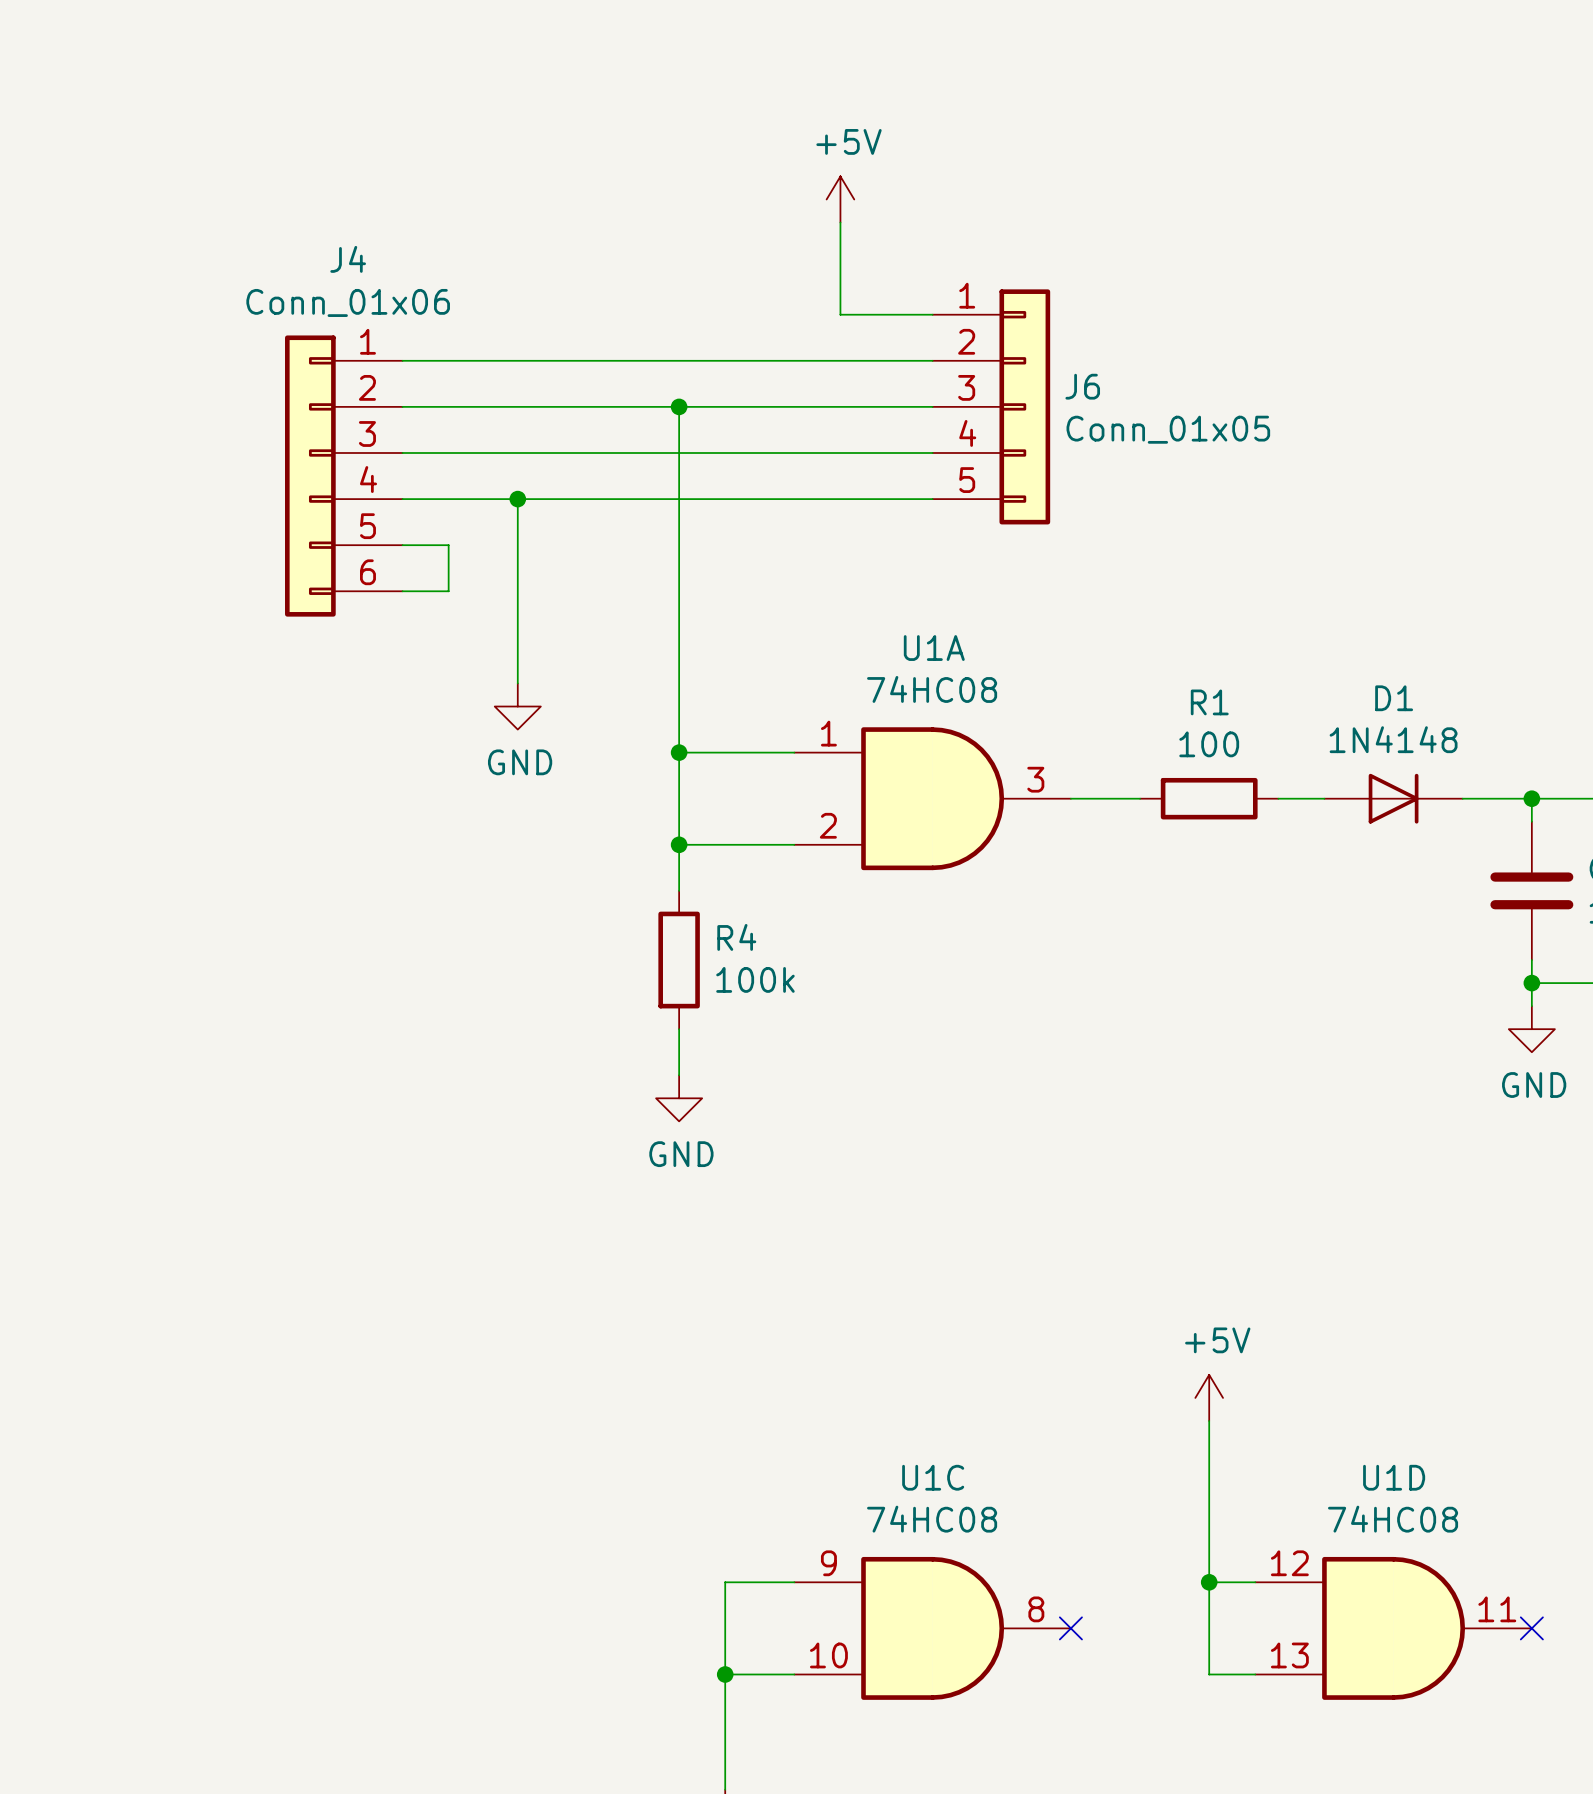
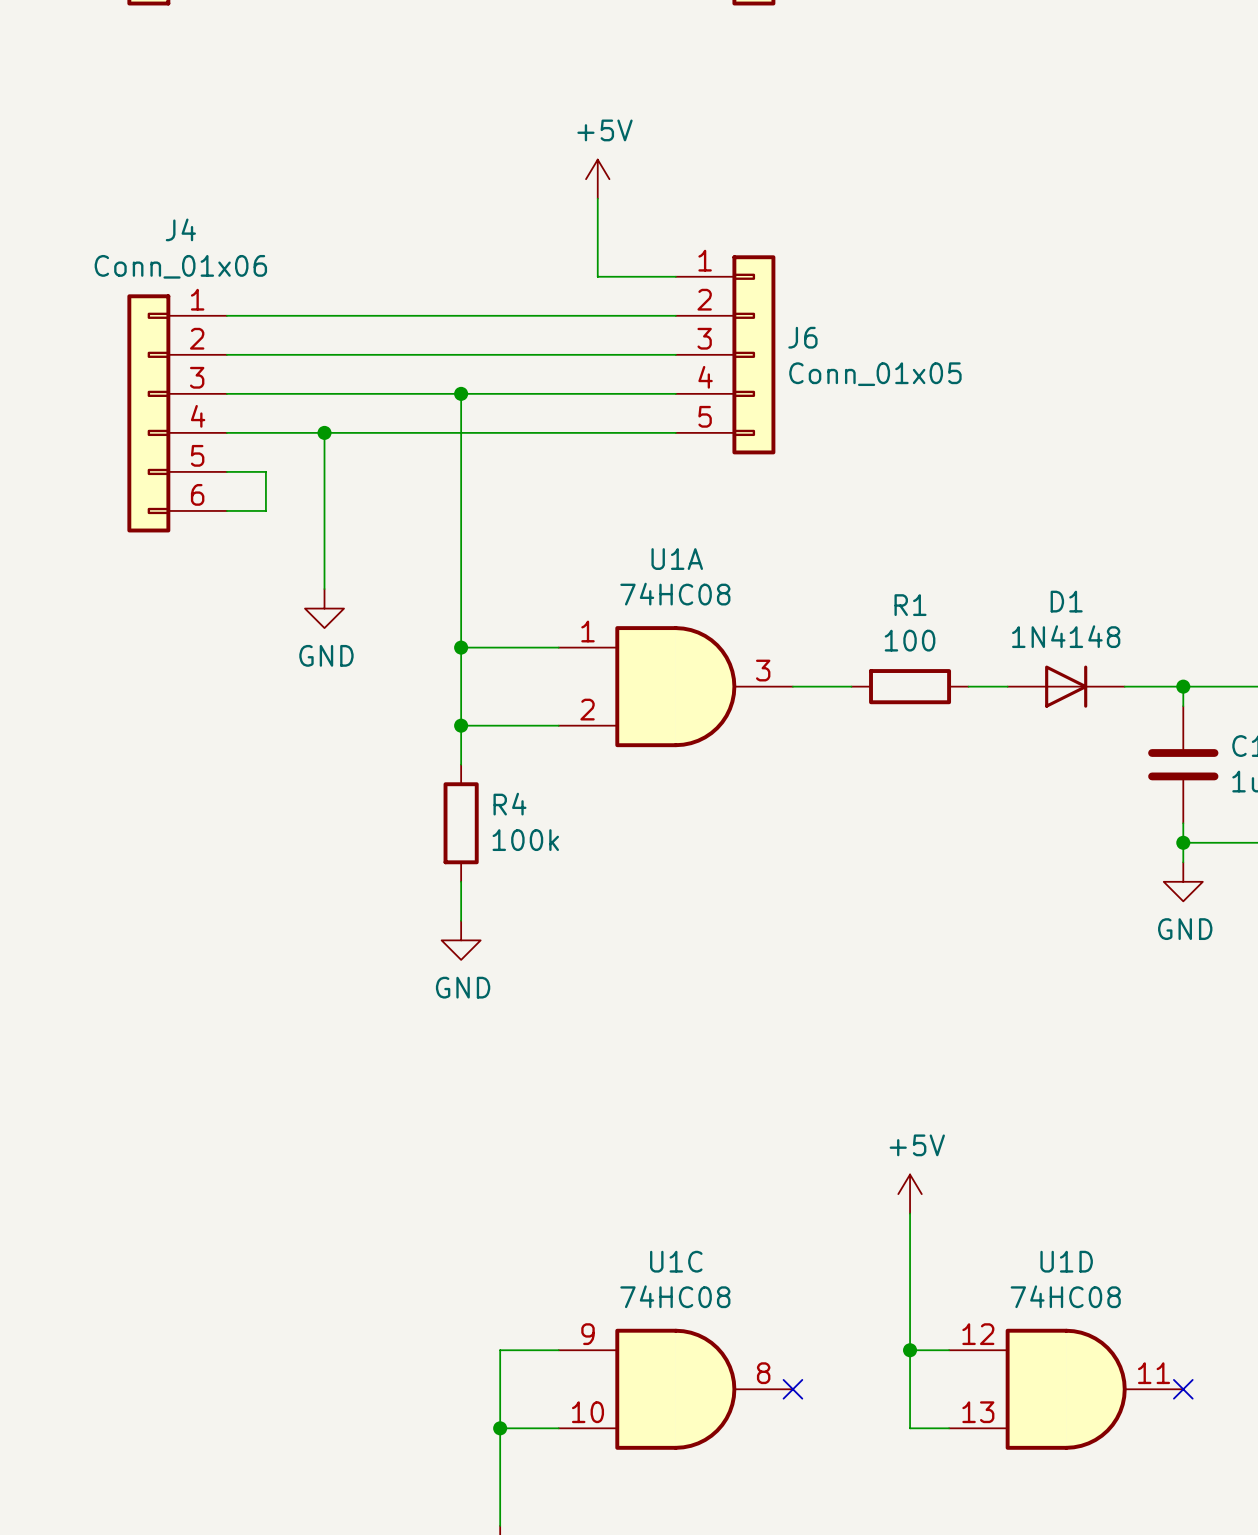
wire: (679, 406) (679, 452) -> none
junction position: (679, 406) -> (461, 393)

